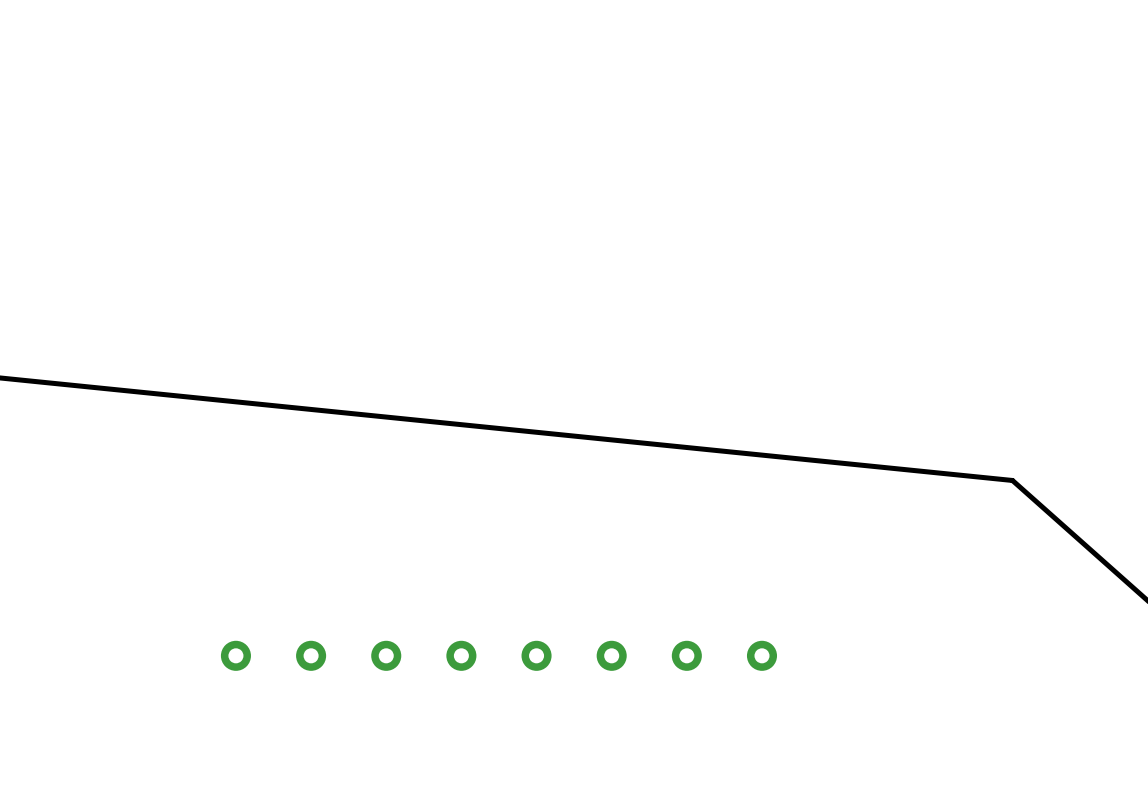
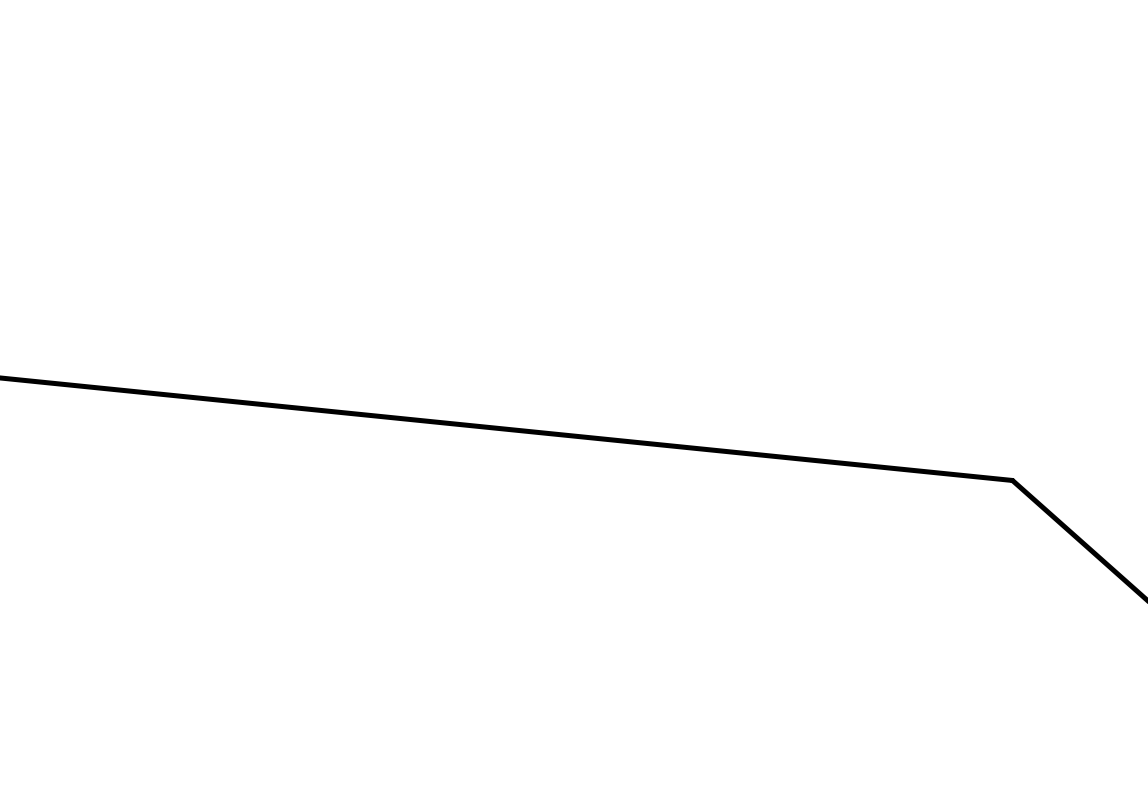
via: (235, 655) -> none
via: (311, 655) -> none
via: (386, 655) -> none
via: (461, 655) -> none
via: (536, 655) -> none
via: (611, 655) -> none
via: (686, 655) -> none
via: (761, 655) -> none

